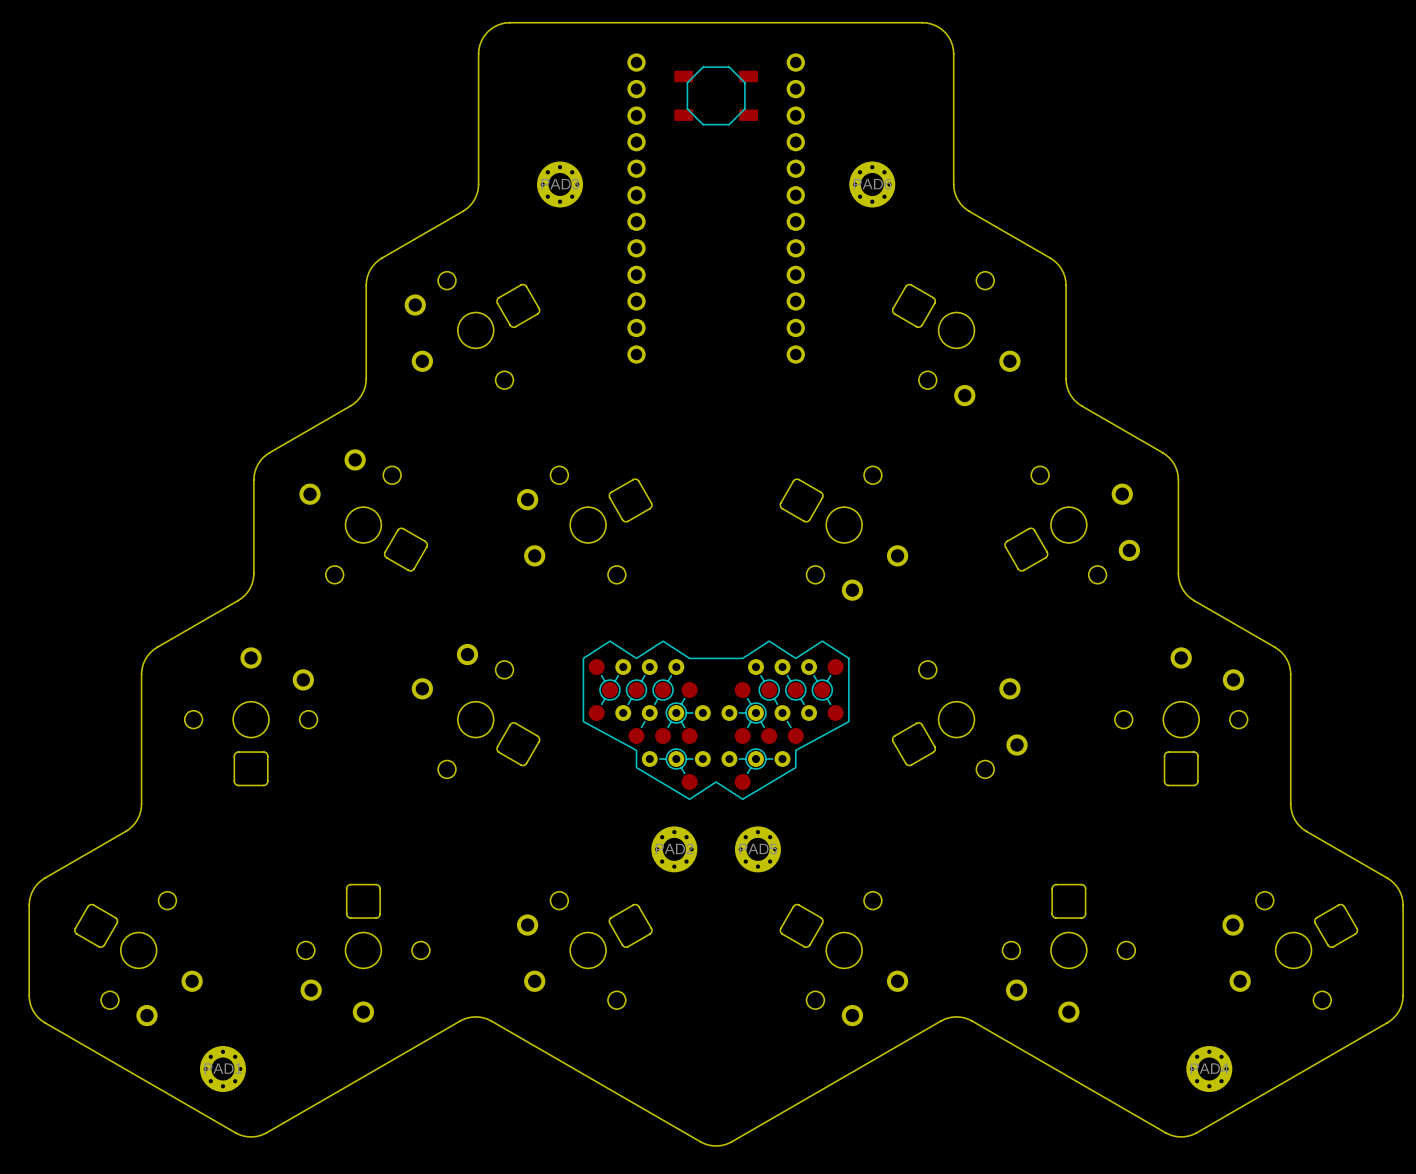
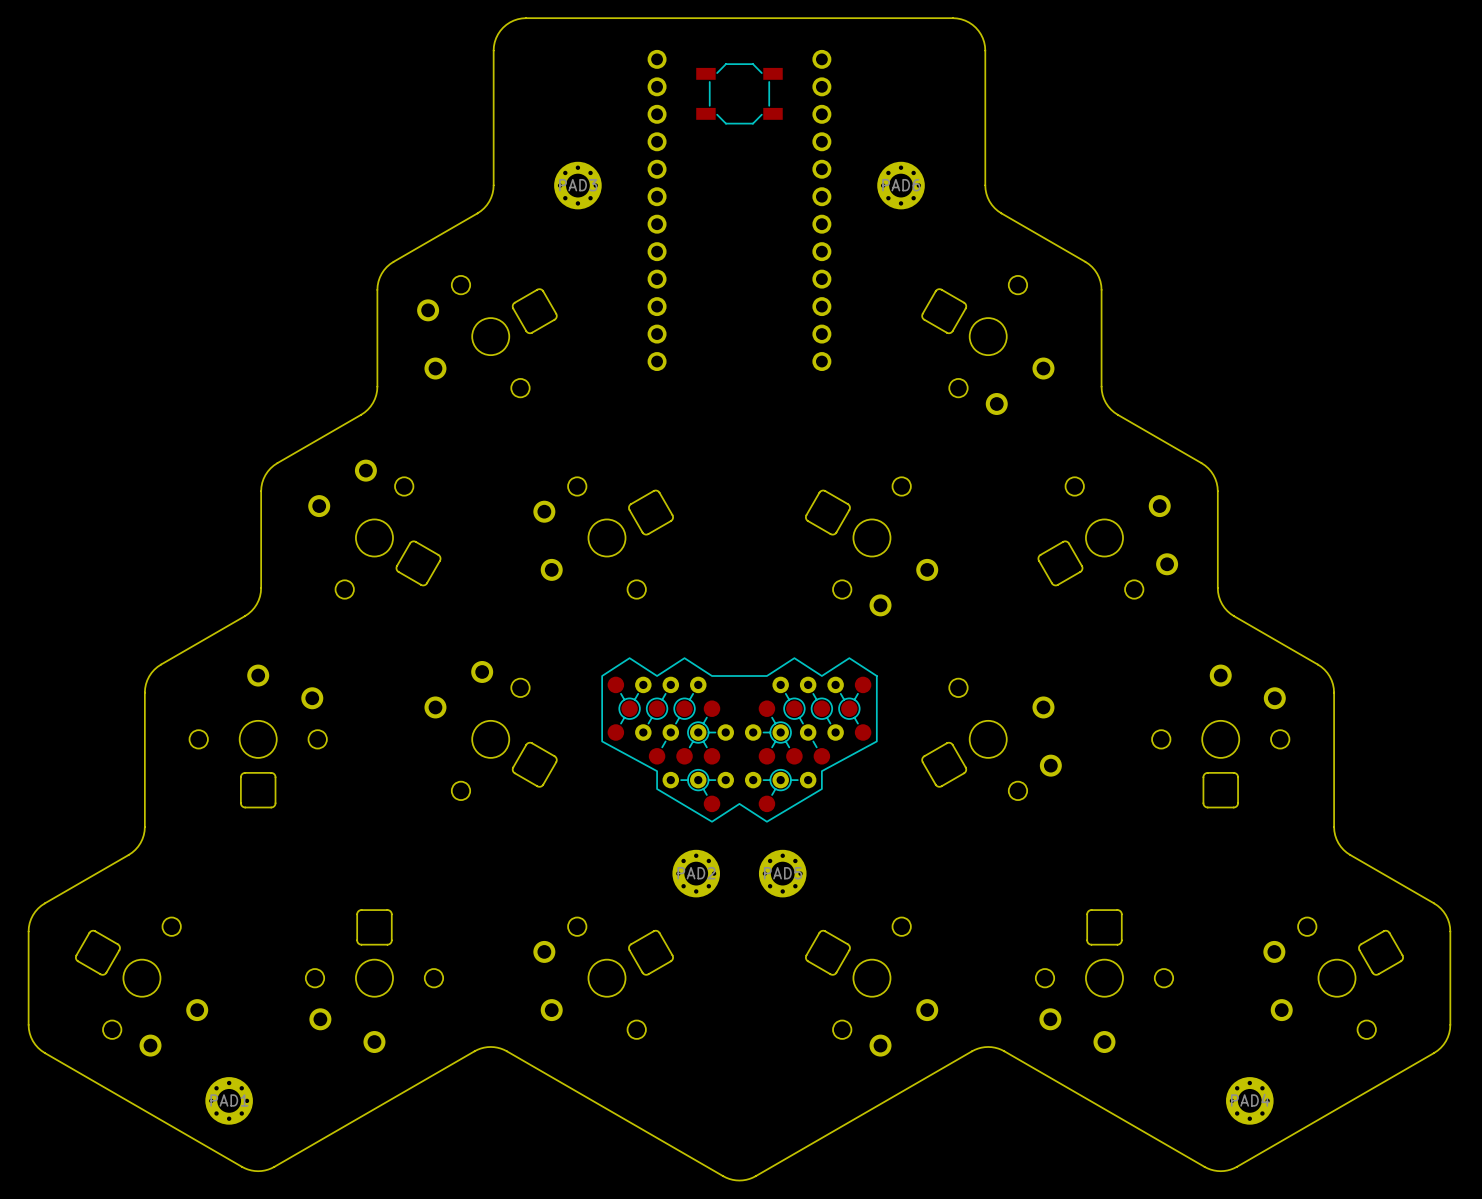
part footprint: [674, 66, 758, 126] -> [696, 63, 783, 125]

